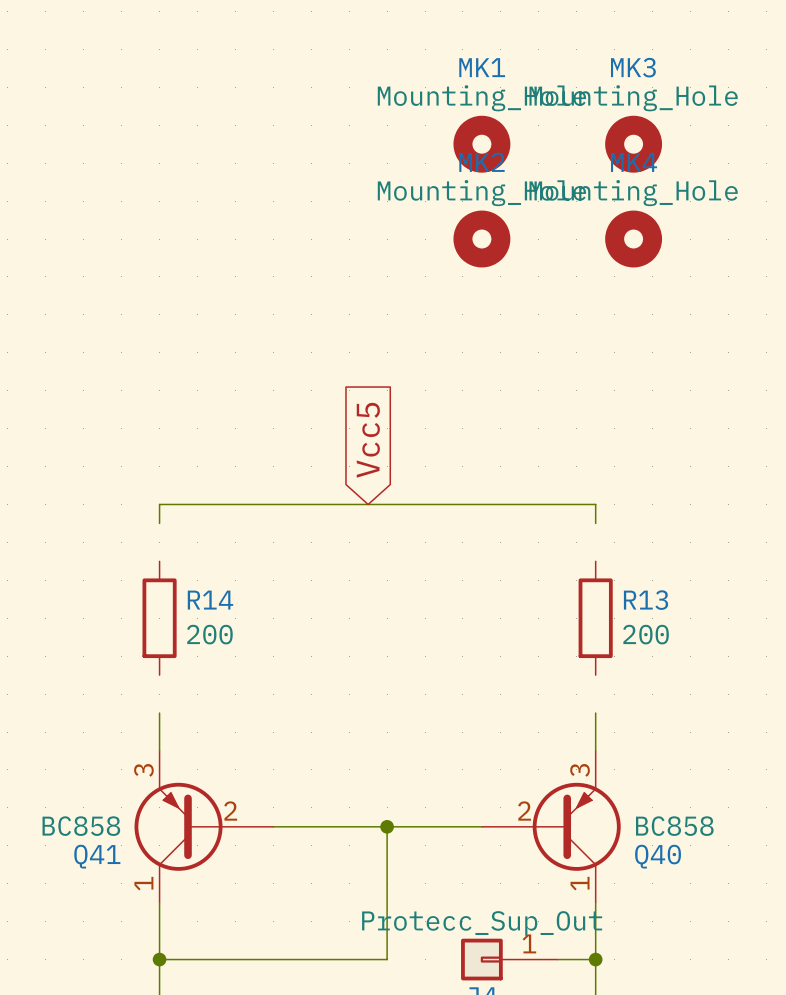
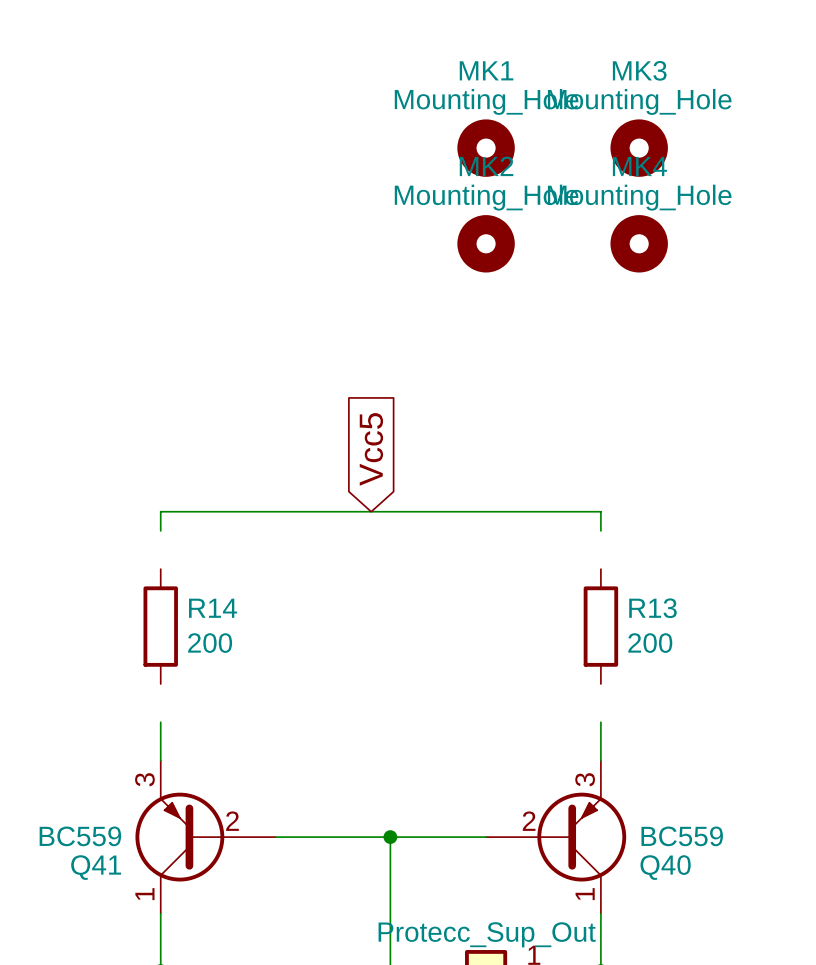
Q41 value: BC858 (81, 826) -> BC559 (80, 836)
Q40 value: BC858 (674, 826) -> BC559 (682, 836)

